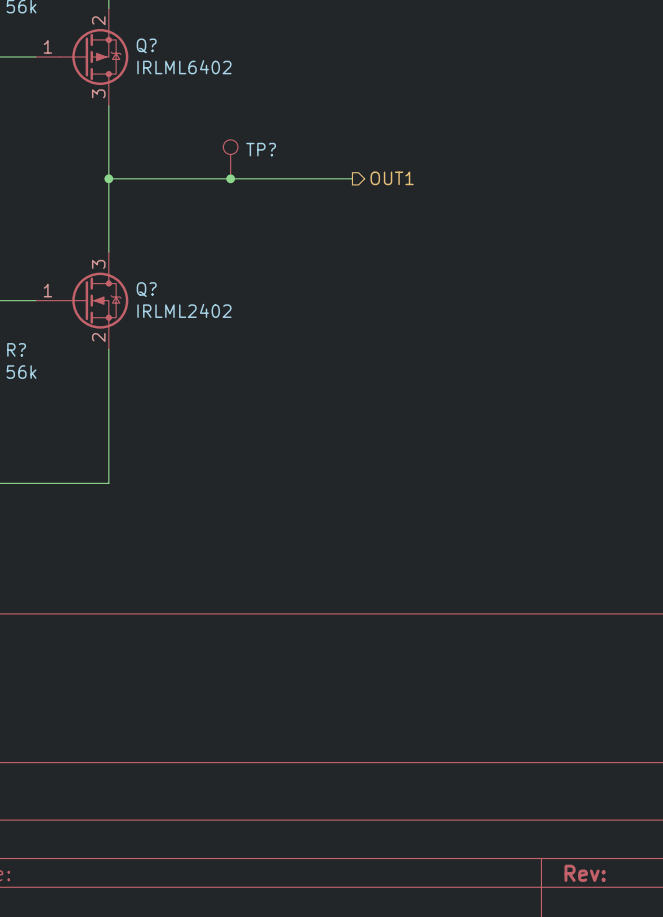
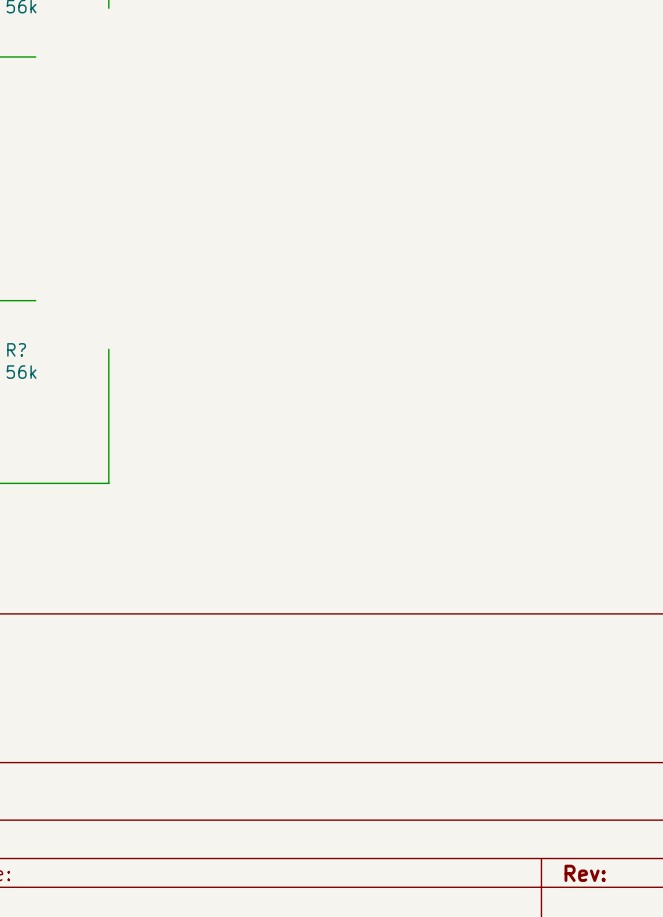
Q?: IRLML6402 (82, 57) -> none
wire: (108, 105) (108, 251) -> none
TP?: (230, 159) -> none
wire: (108, 178) (352, 178) -> none
junction: (108, 178) -> none
junction: (230, 178) -> none
hierarchical label: OUT1 (392, 178) -> none
Q?: IRLML2402 (82, 300) -> none

